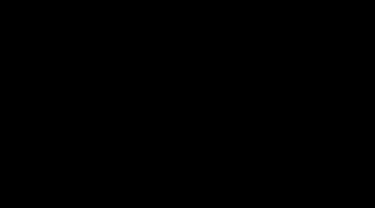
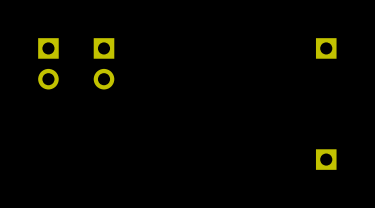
part: none -> (326, 48)
part: none -> (48, 63)
part: none -> (104, 63)
part: none -> (326, 159)

